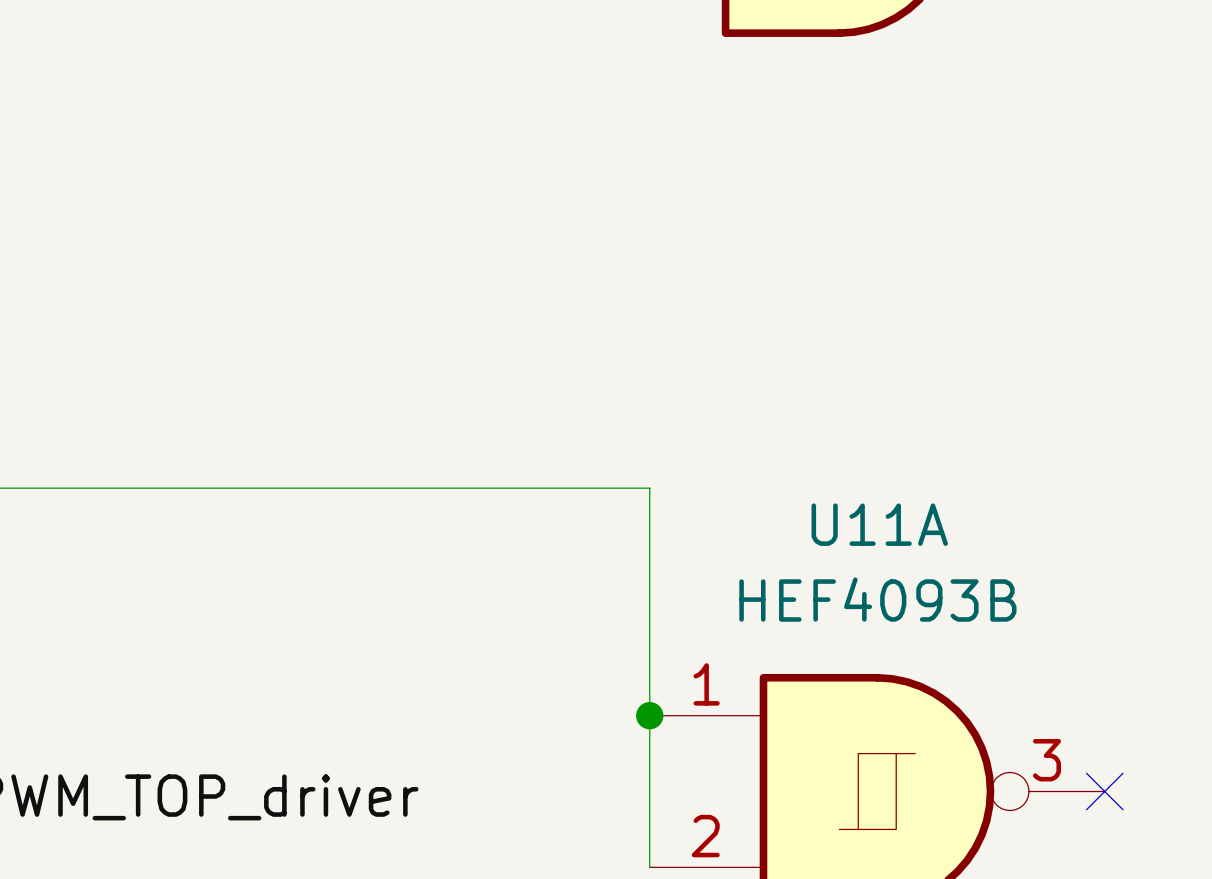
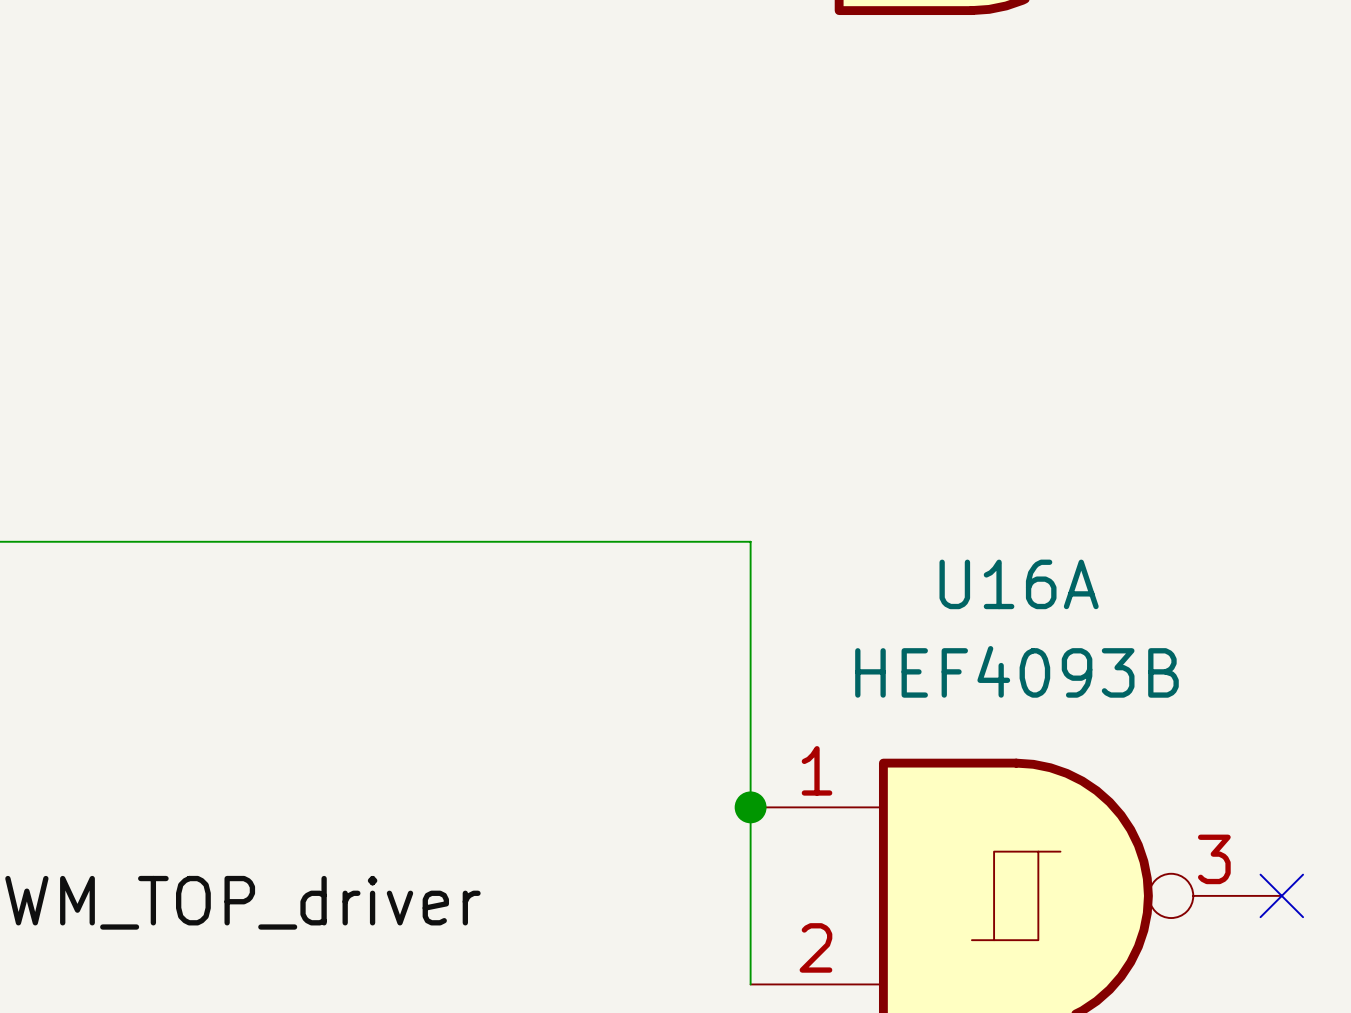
U11A name: U11A (879, 524) -> U16A (1019, 584)

